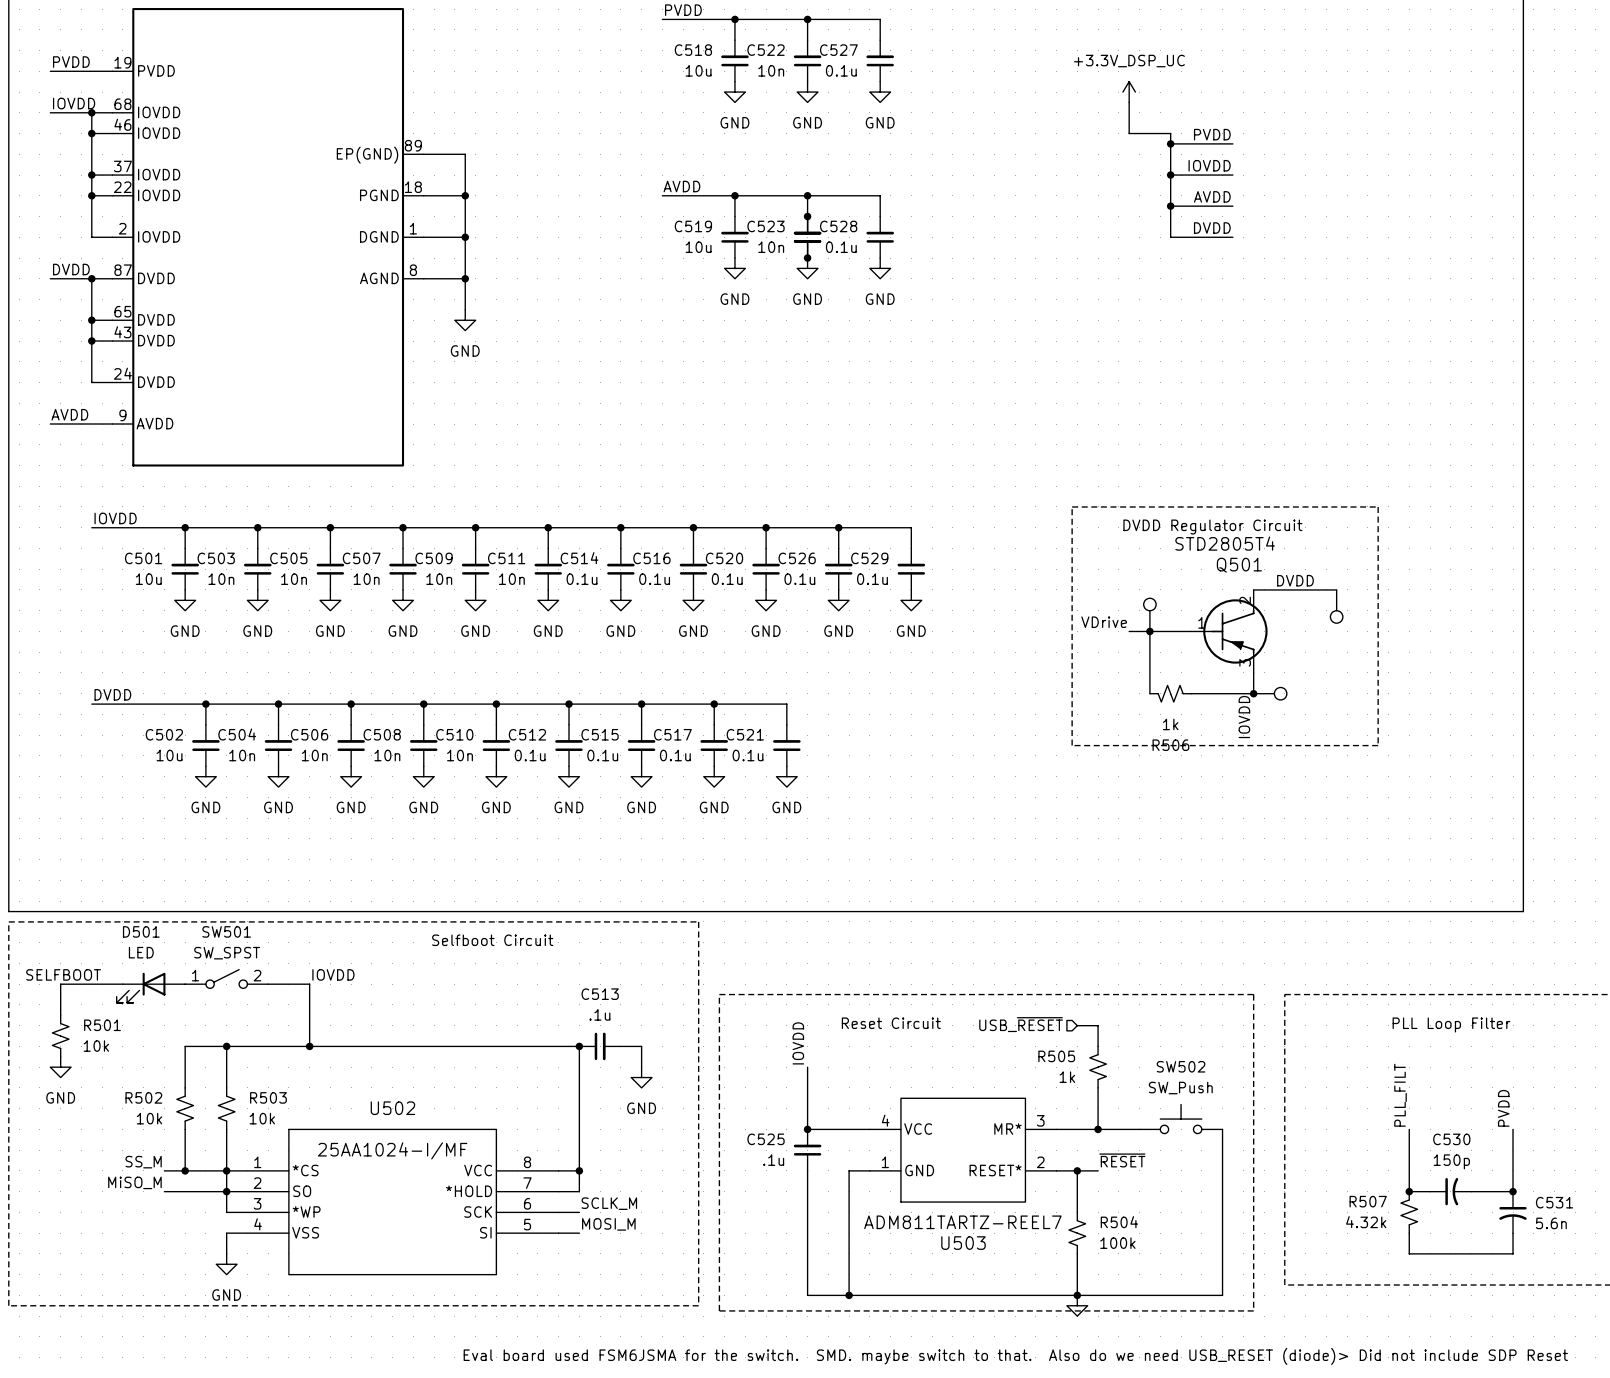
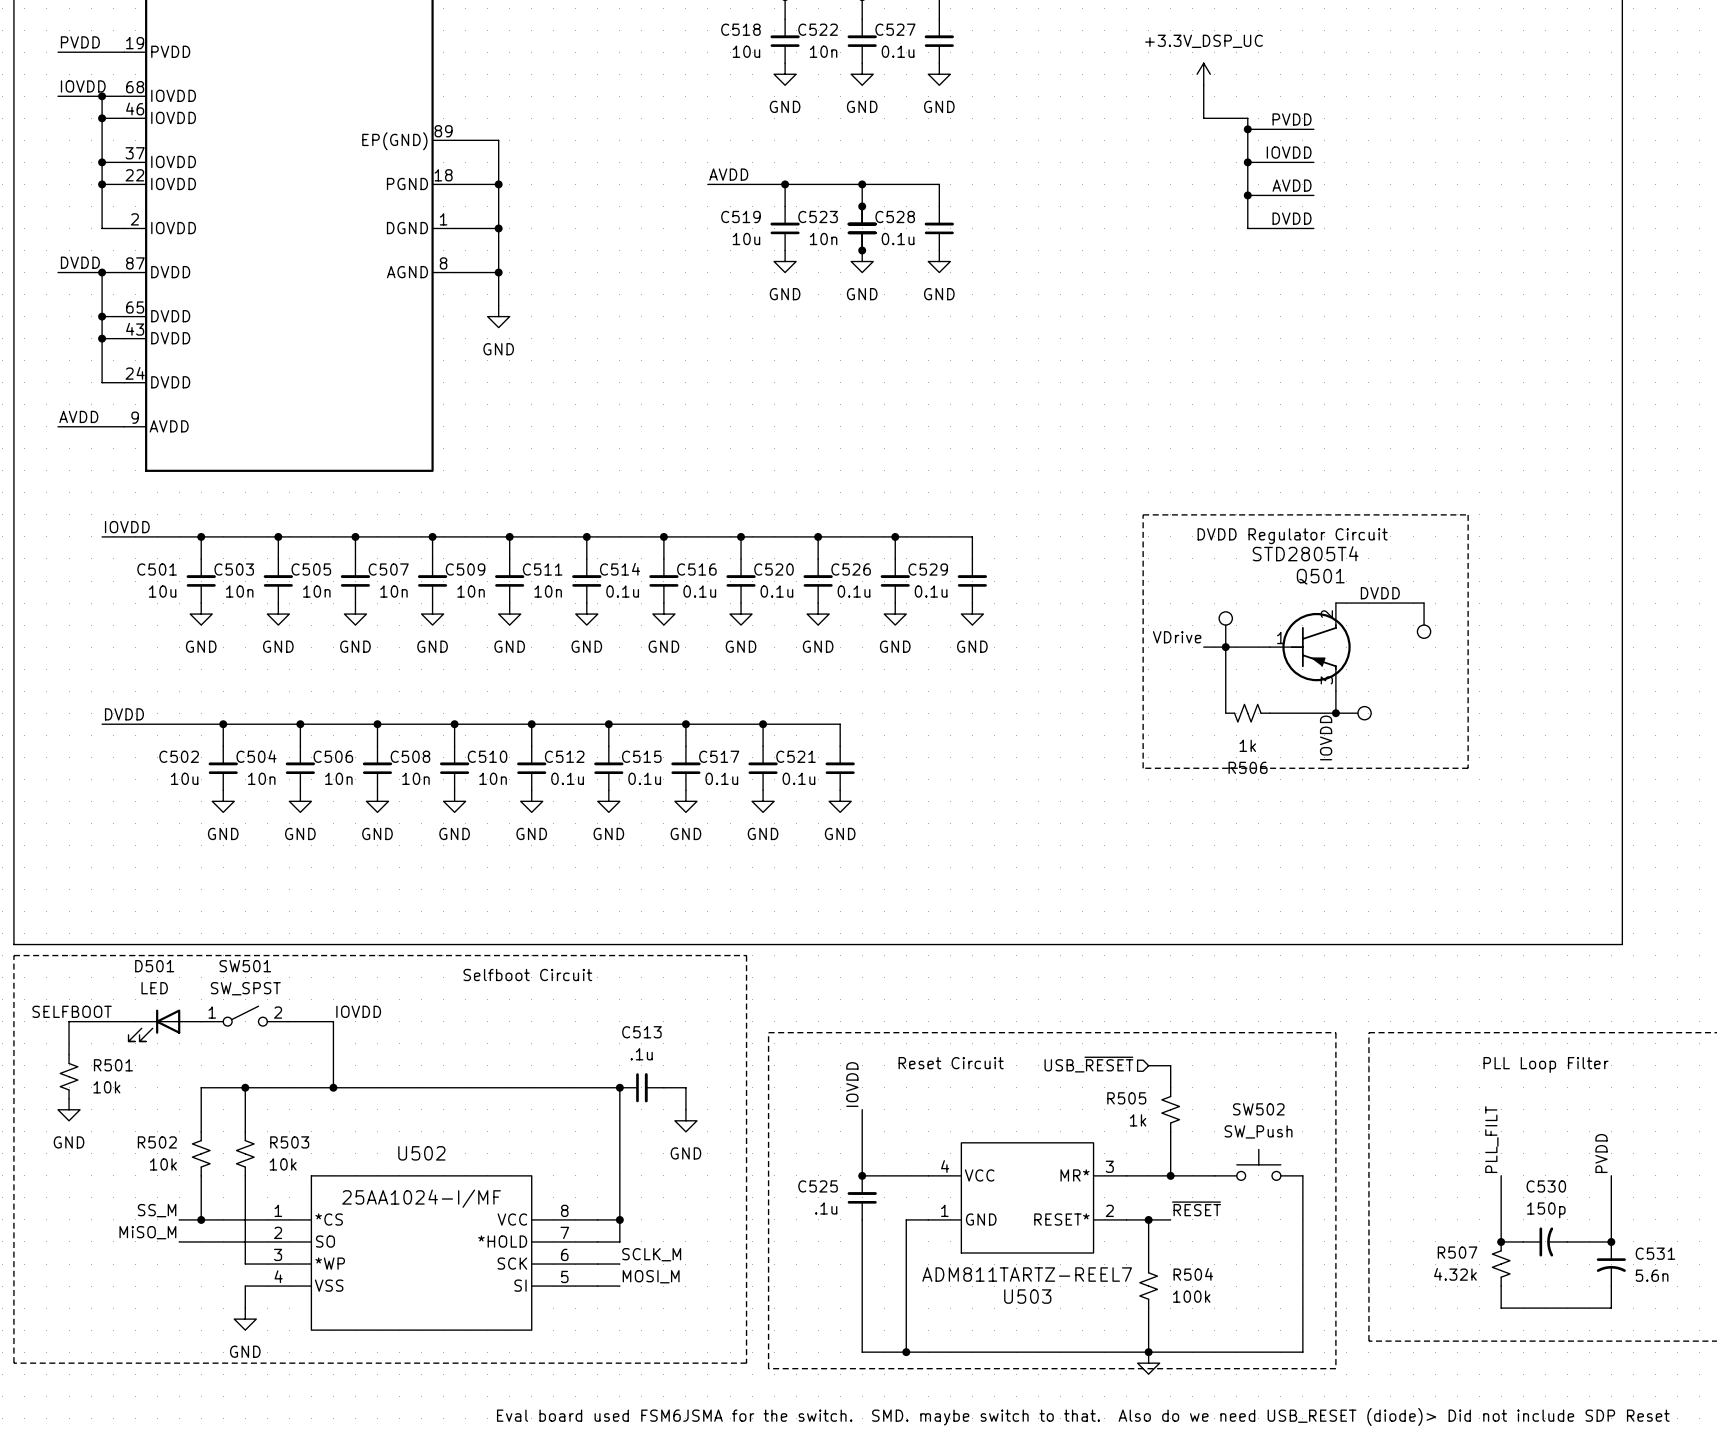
junction: (226, 1170) -> none
junction: (226, 1191) -> none

